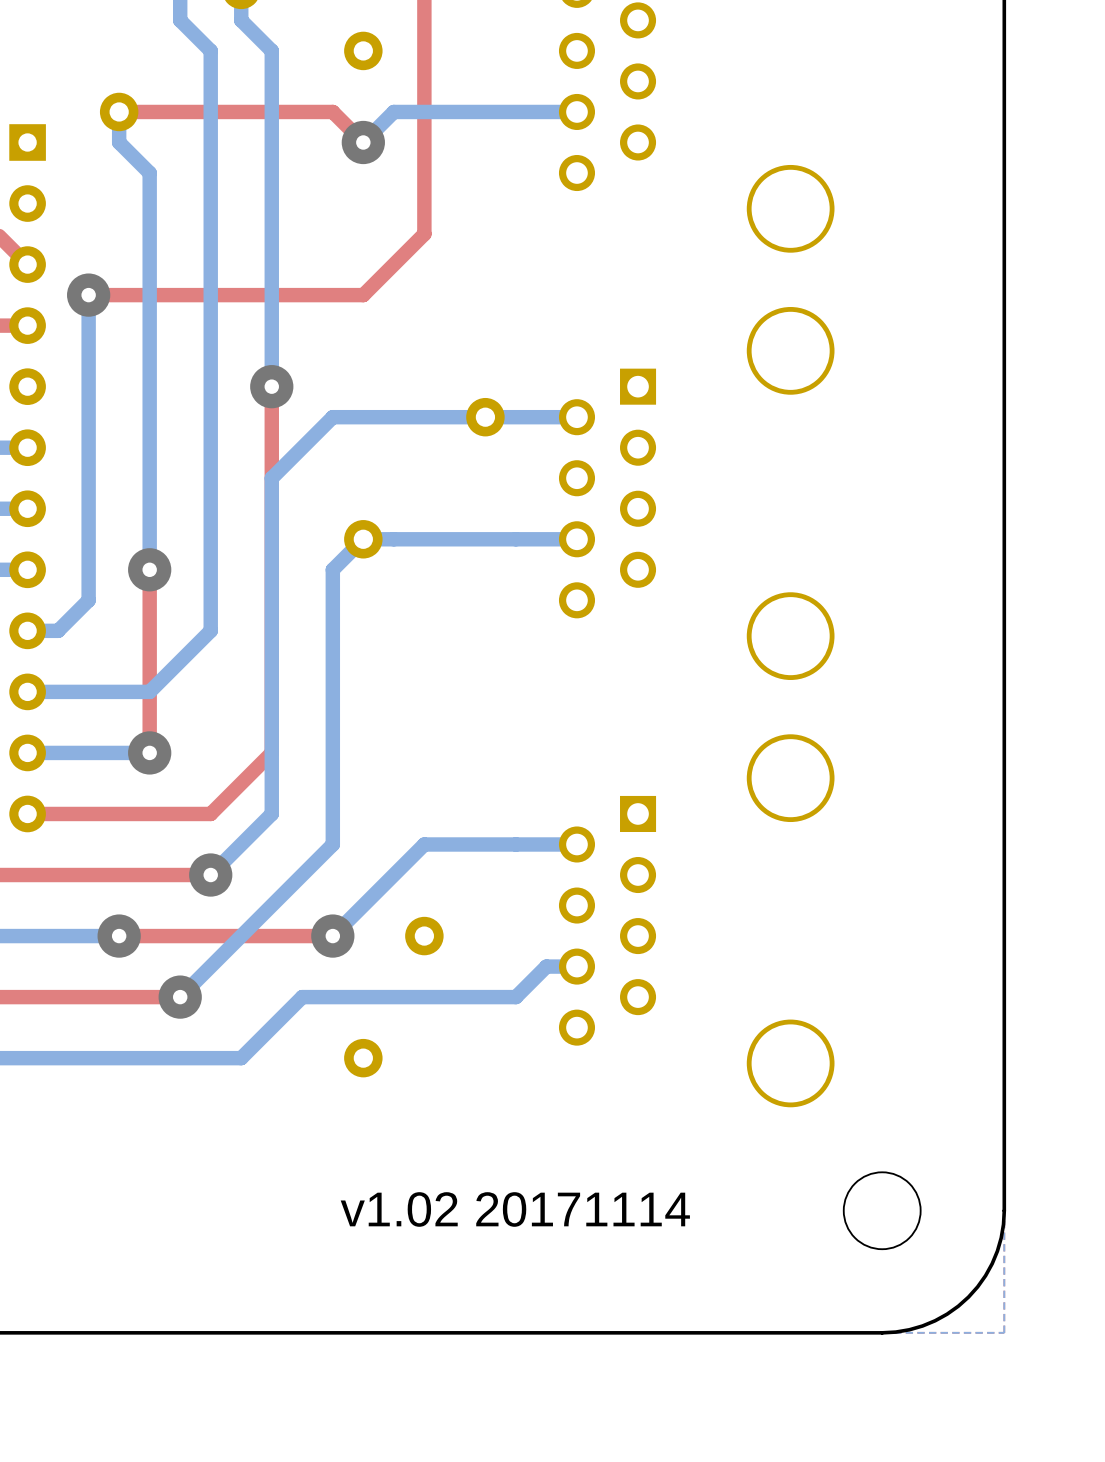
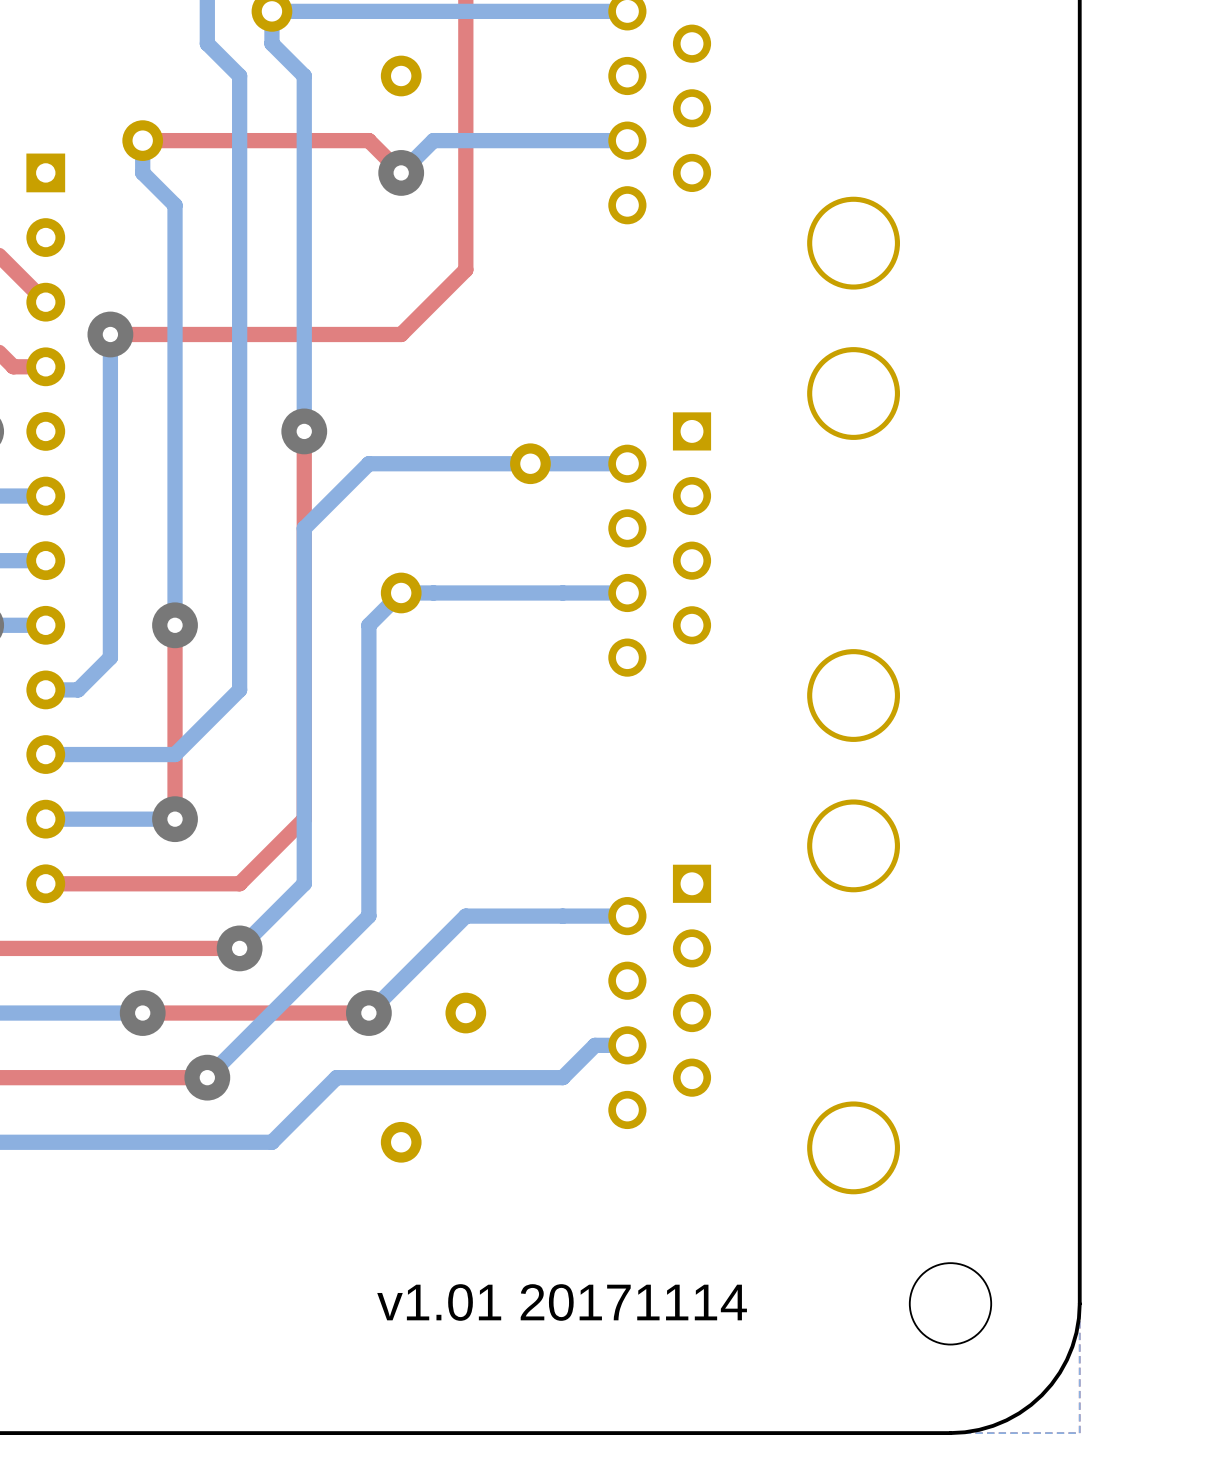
text: v1.02 20171114 (515, 1209) -> v1.01 20171114 (562, 1302)

